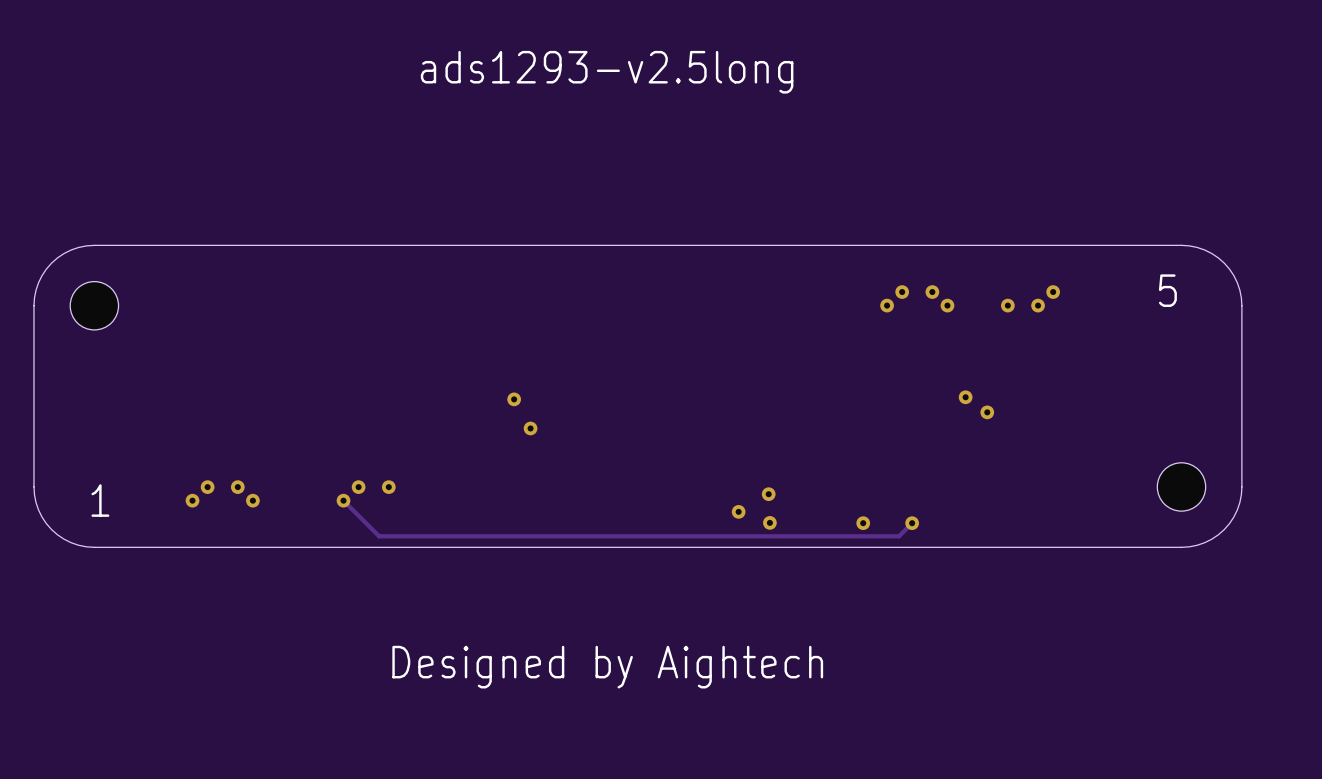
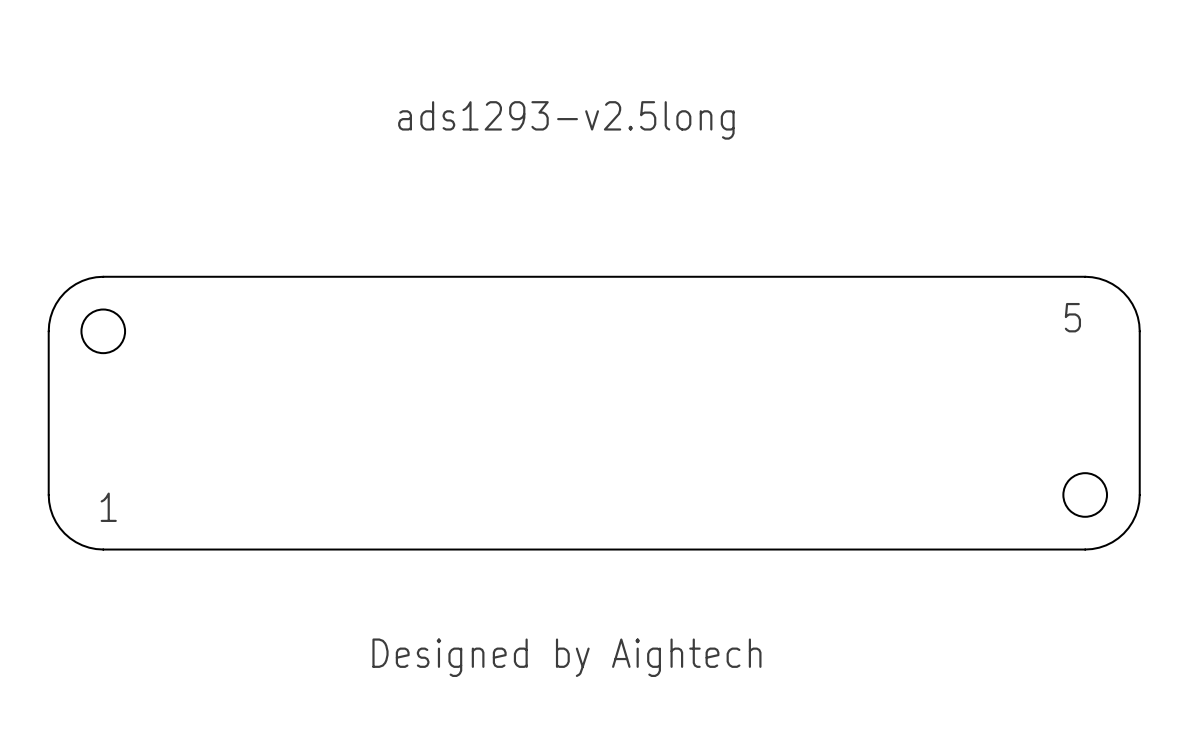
via: (902, 292) -> none
via: (932, 292) -> none
via: (1053, 292) -> none
via: (887, 305) -> none
via: (947, 305) -> none
via: (1007, 305) -> none
via: (1038, 305) -> none
via: (965, 397) -> none
via: (514, 399) -> none
via: (987, 412) -> none
via: (530, 428) -> none
via: (207, 487) -> none
via: (237, 487) -> none
via: (358, 487) -> none
via: (388, 487) -> none
via: (768, 494) -> none
via: (192, 500) -> none
via: (252, 500) -> none
track: (343, 500) (379, 536) (899, 536) (912, 523) -> none
via: (343, 500) -> none
via: (738, 511) -> none
via: (769, 522) -> none
via: (863, 523) -> none
via: (912, 523) -> none

